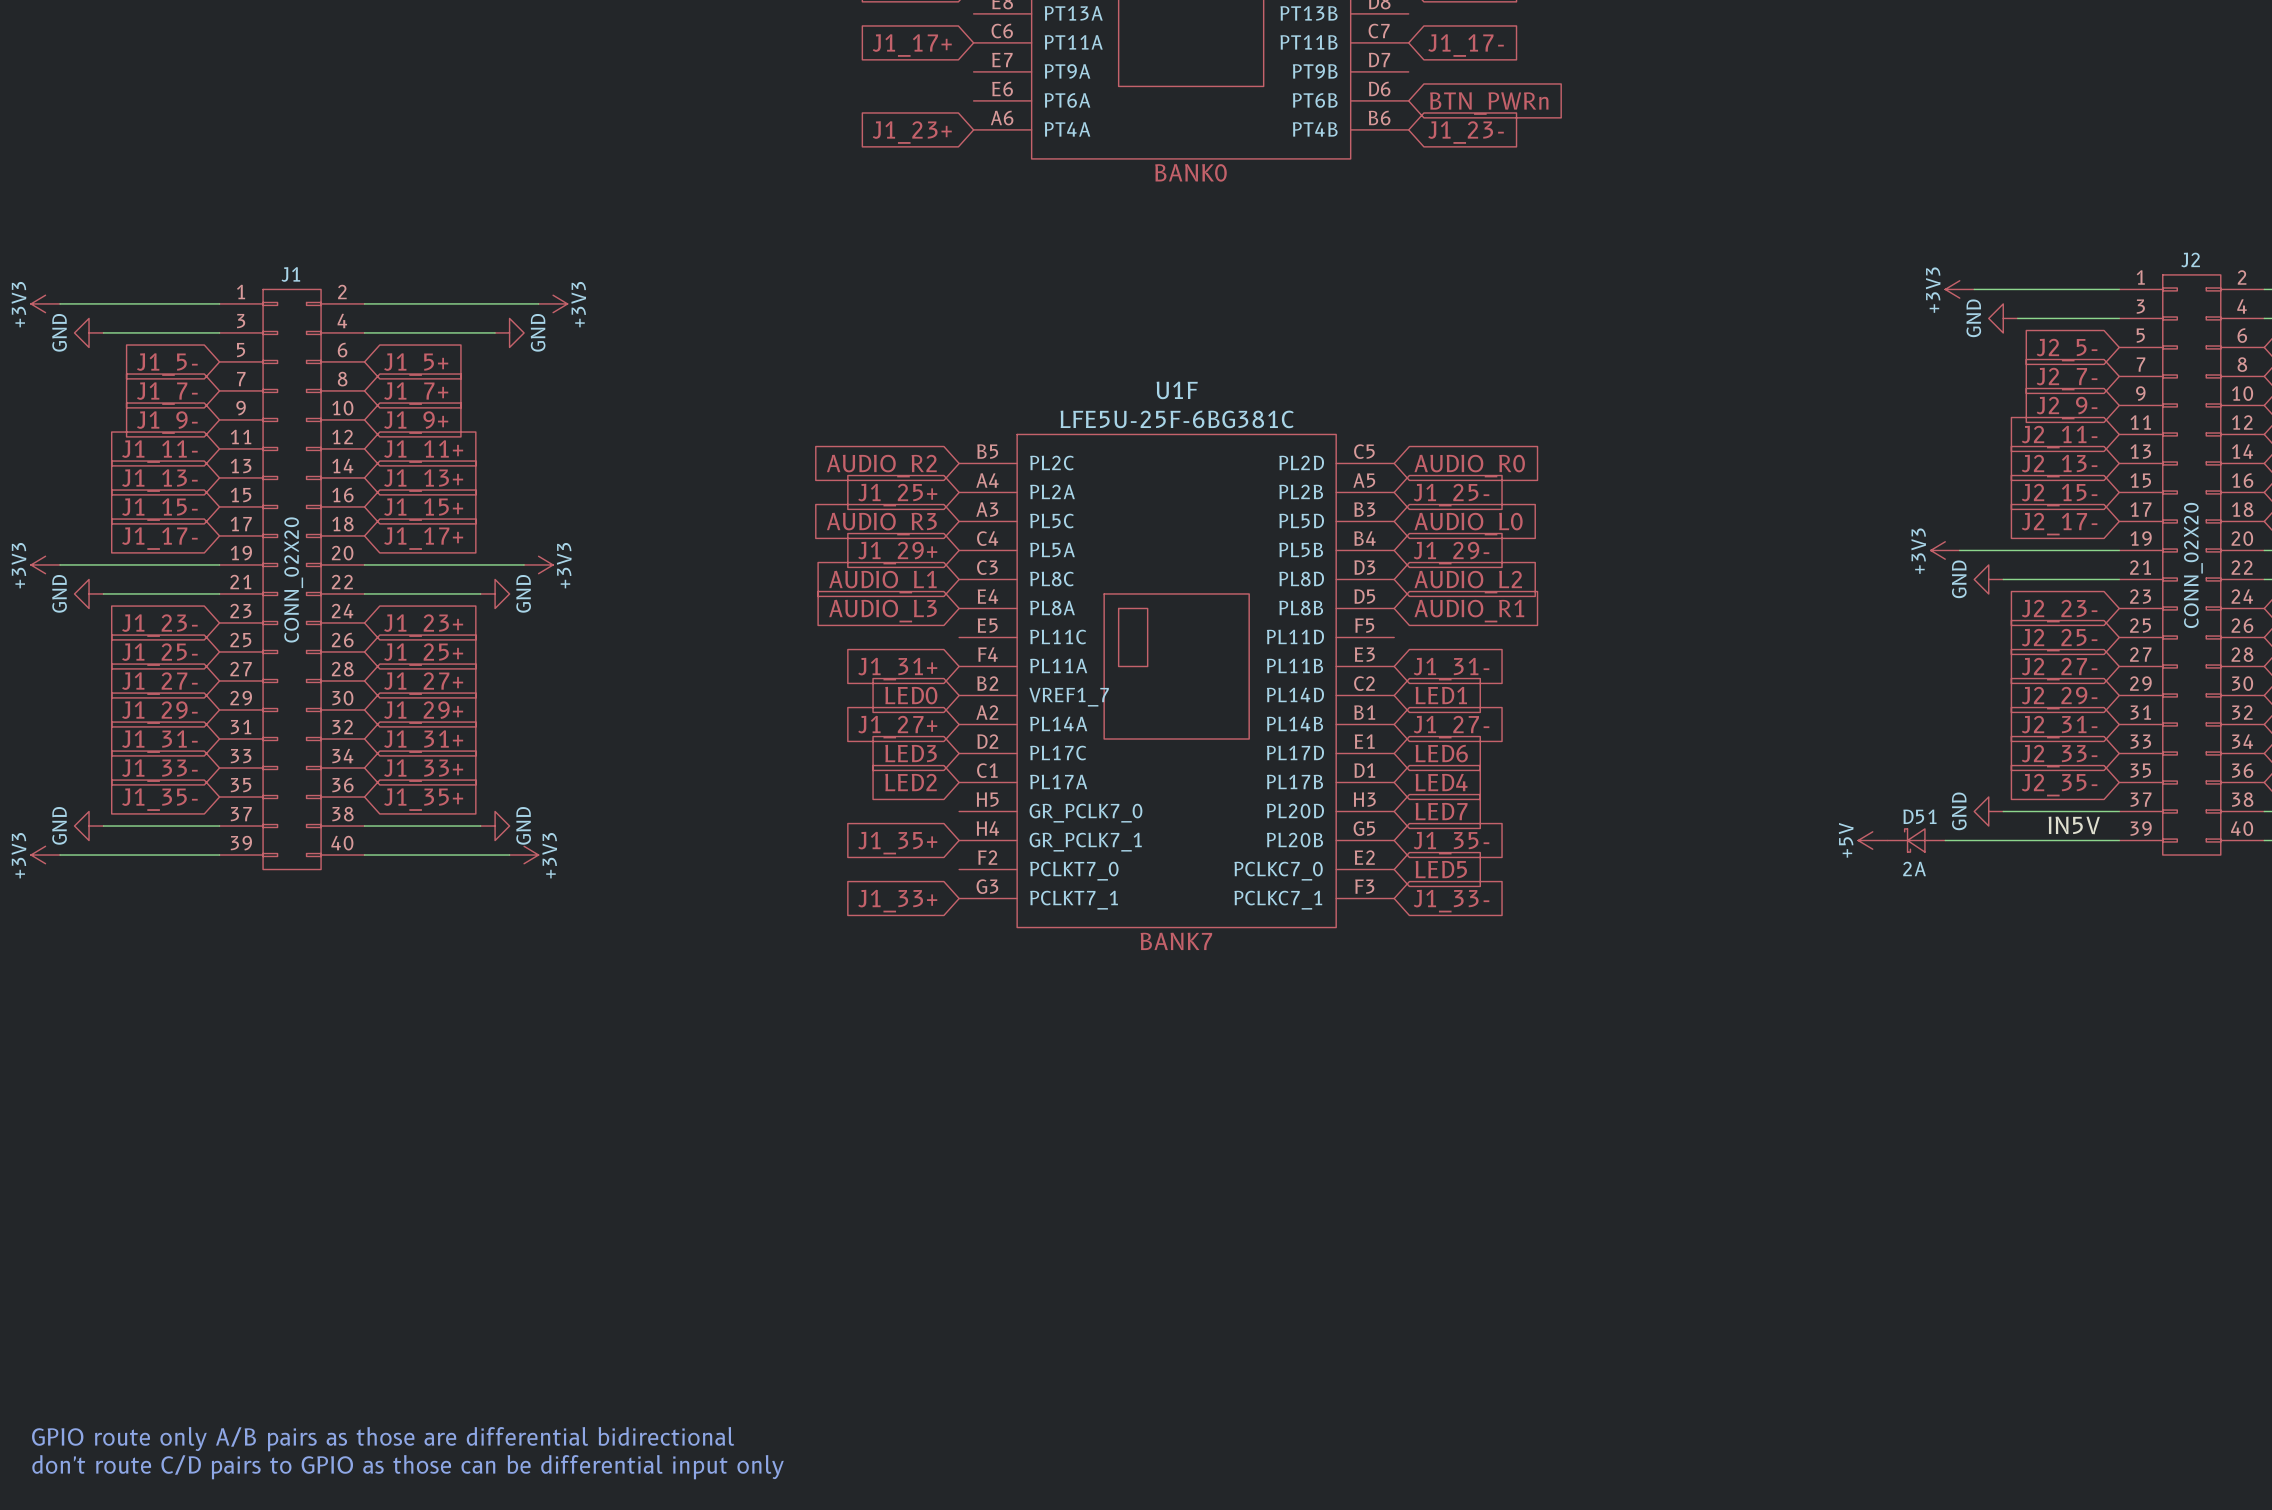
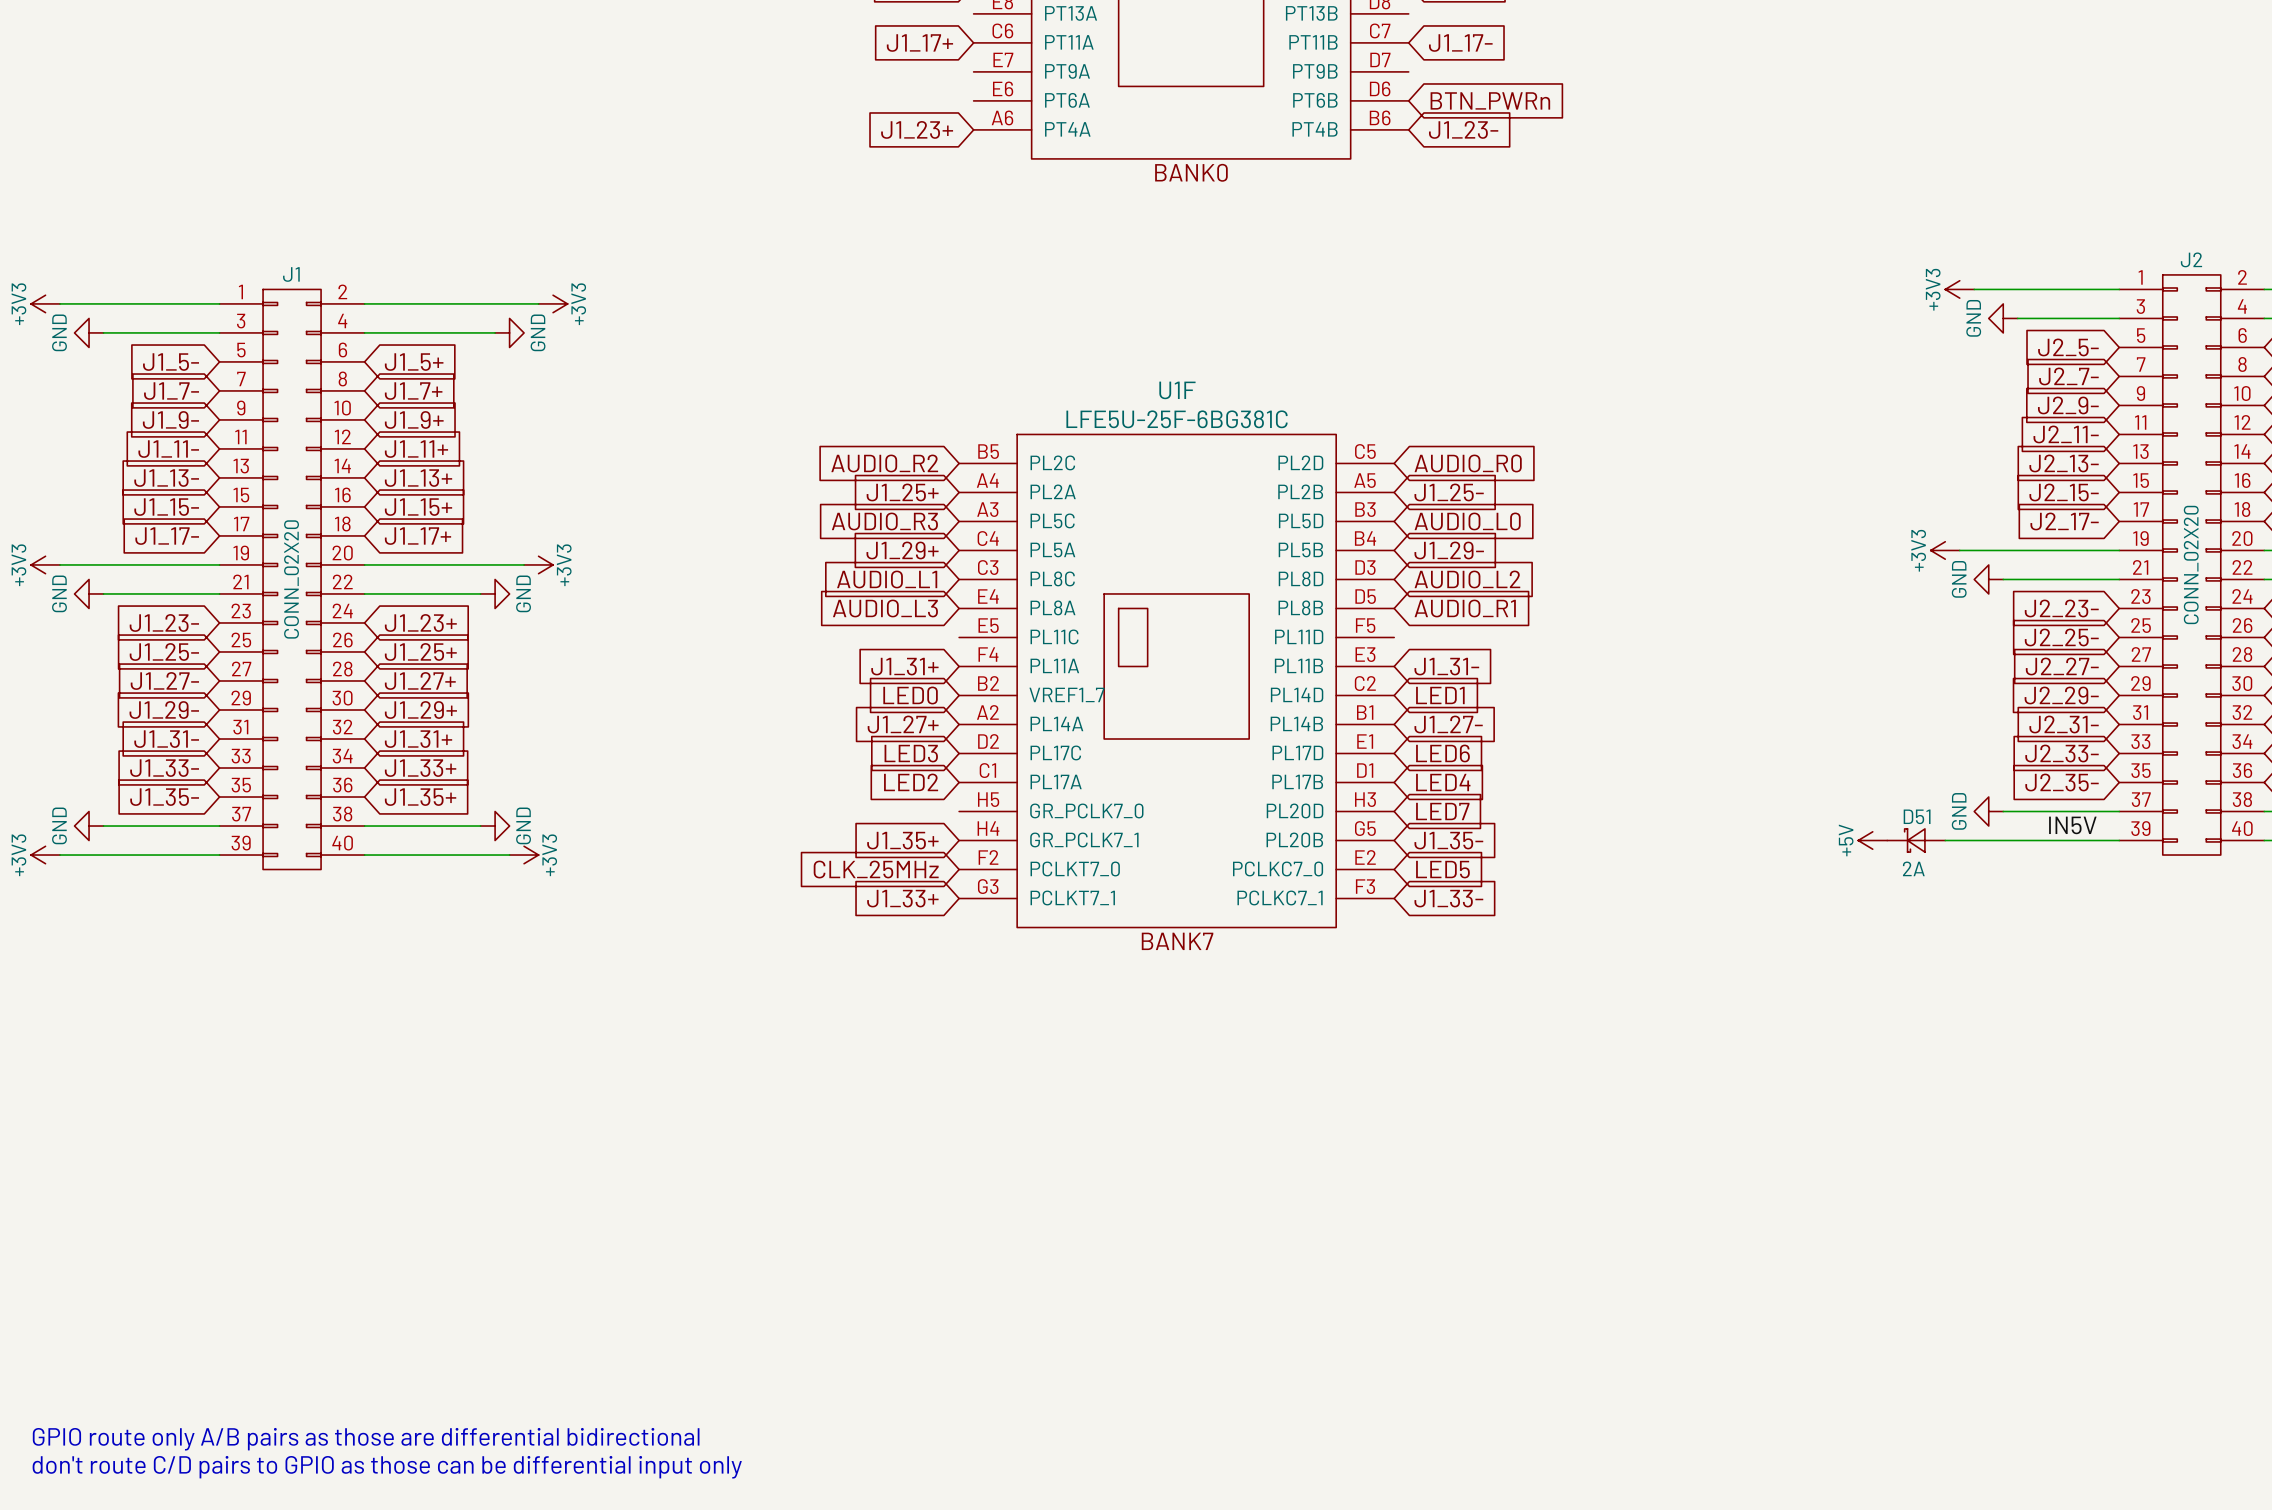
global label: none -> CLK_25MHz (876, 869)

